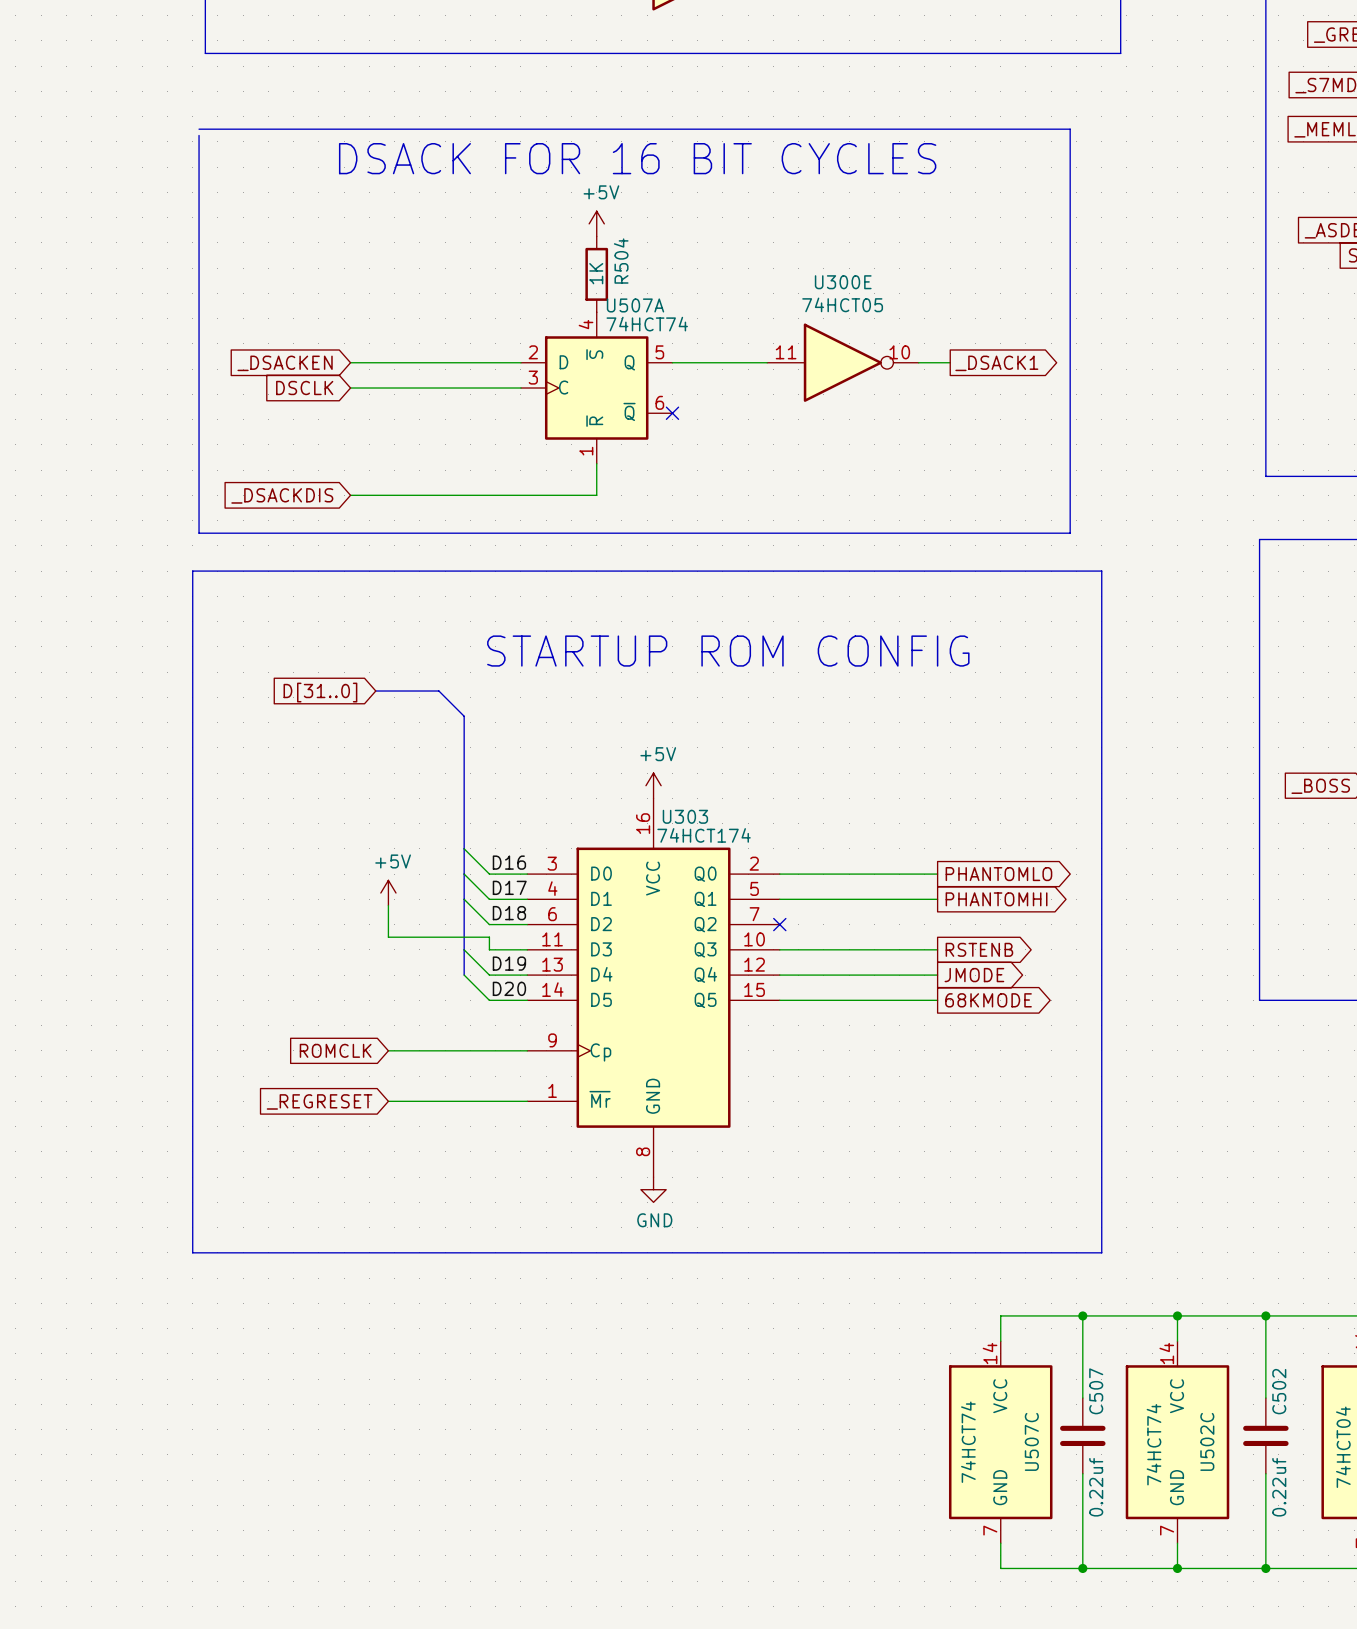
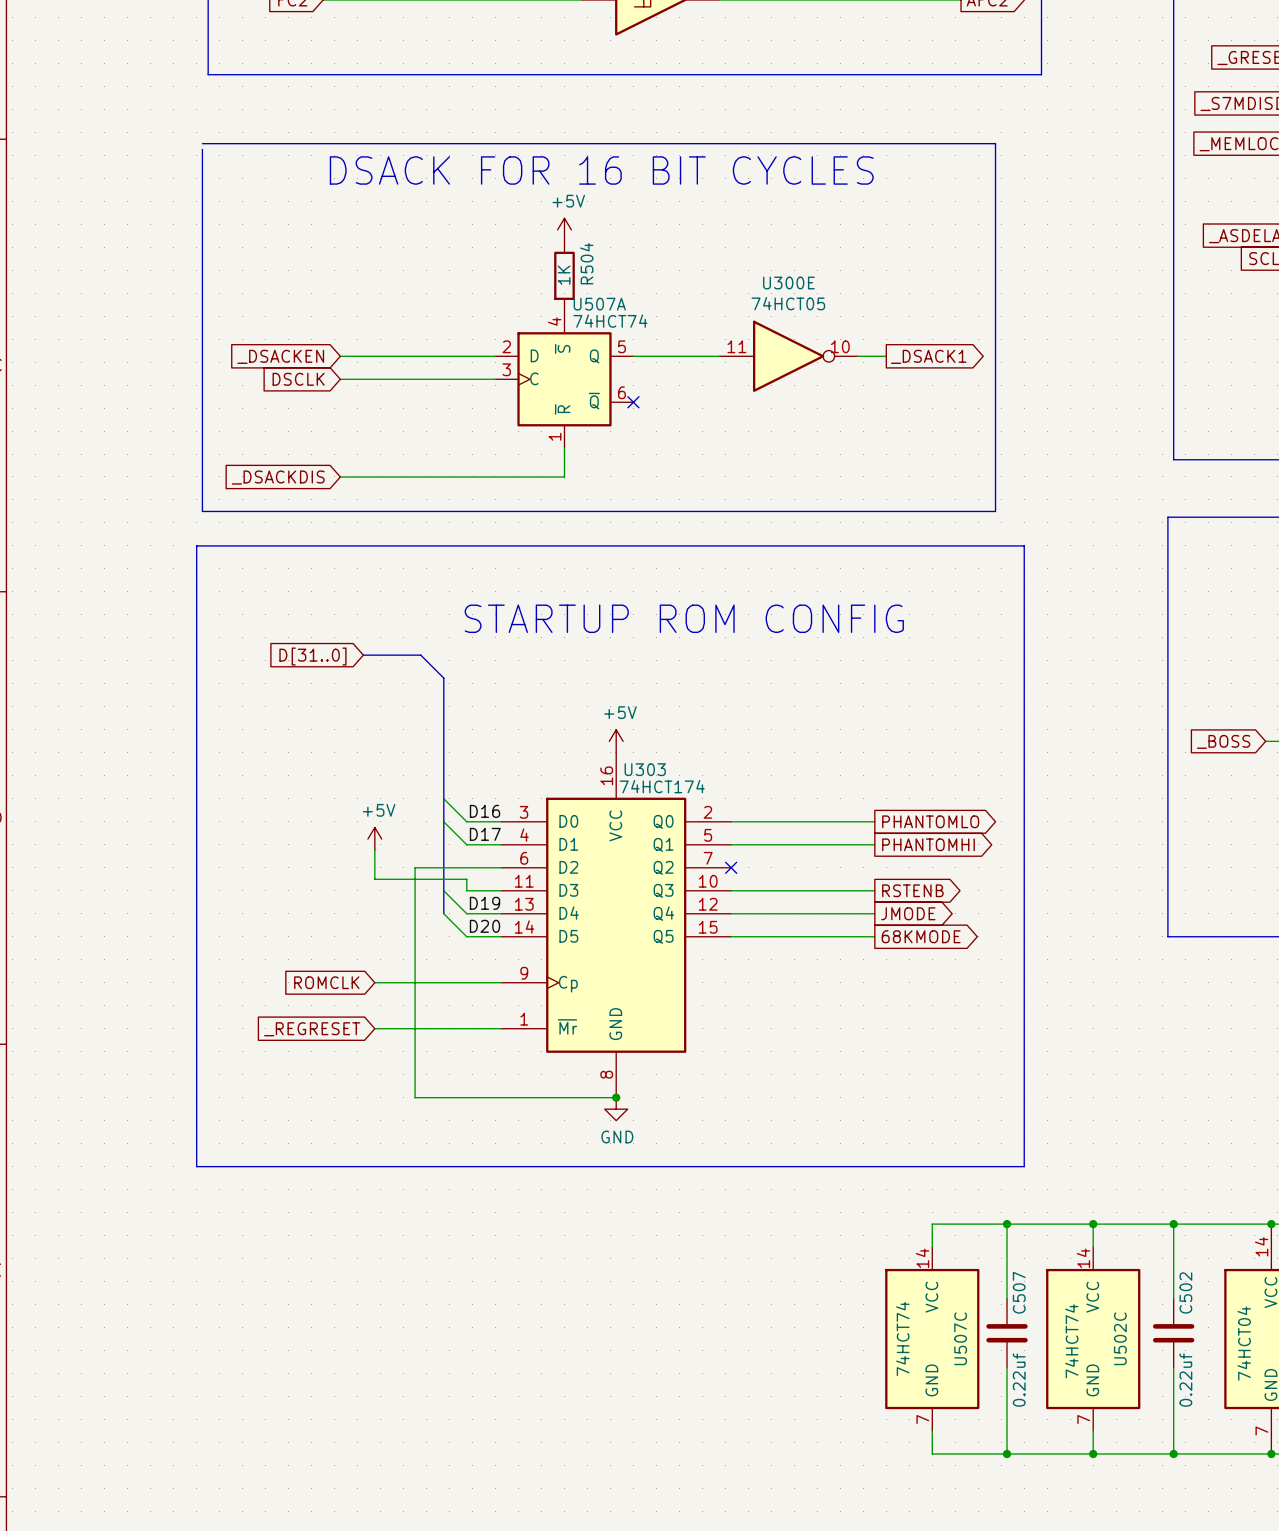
wire: (464, 899) (489, 924) -> (616, 1097) (415, 1097) (415, 867) (466, 867)
label: D18 (509, 913) -> none
junction: none -> (616, 1097)

